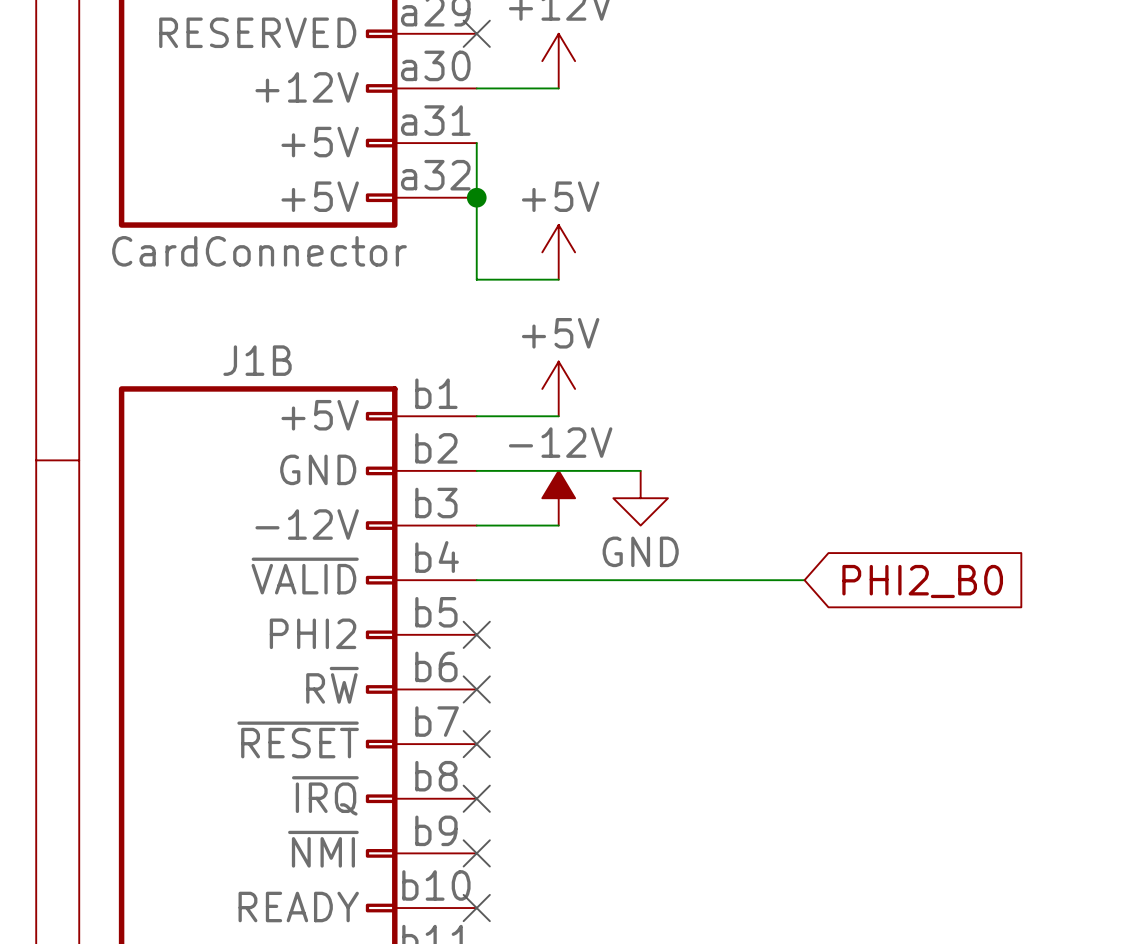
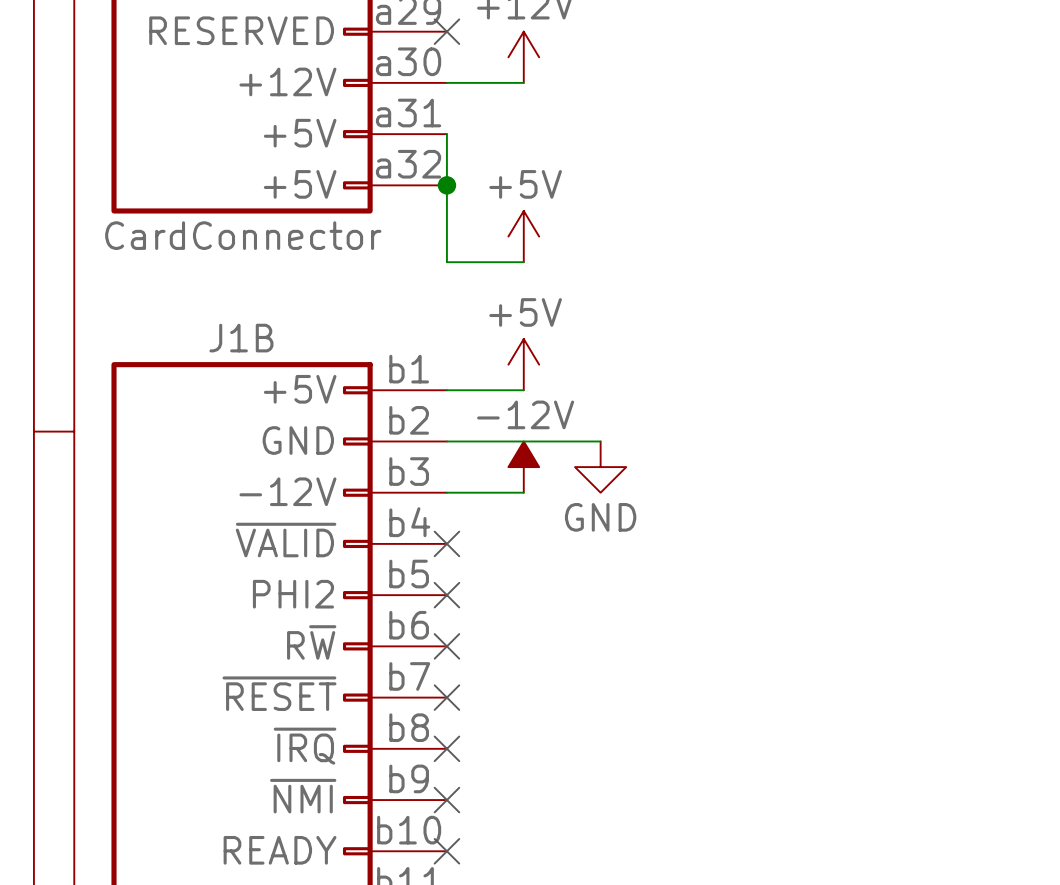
wire: (476, 580) (804, 580) -> none
no-connect mark: none -> (446, 543)
global label: PHI2_B0 (922, 581) -> none

